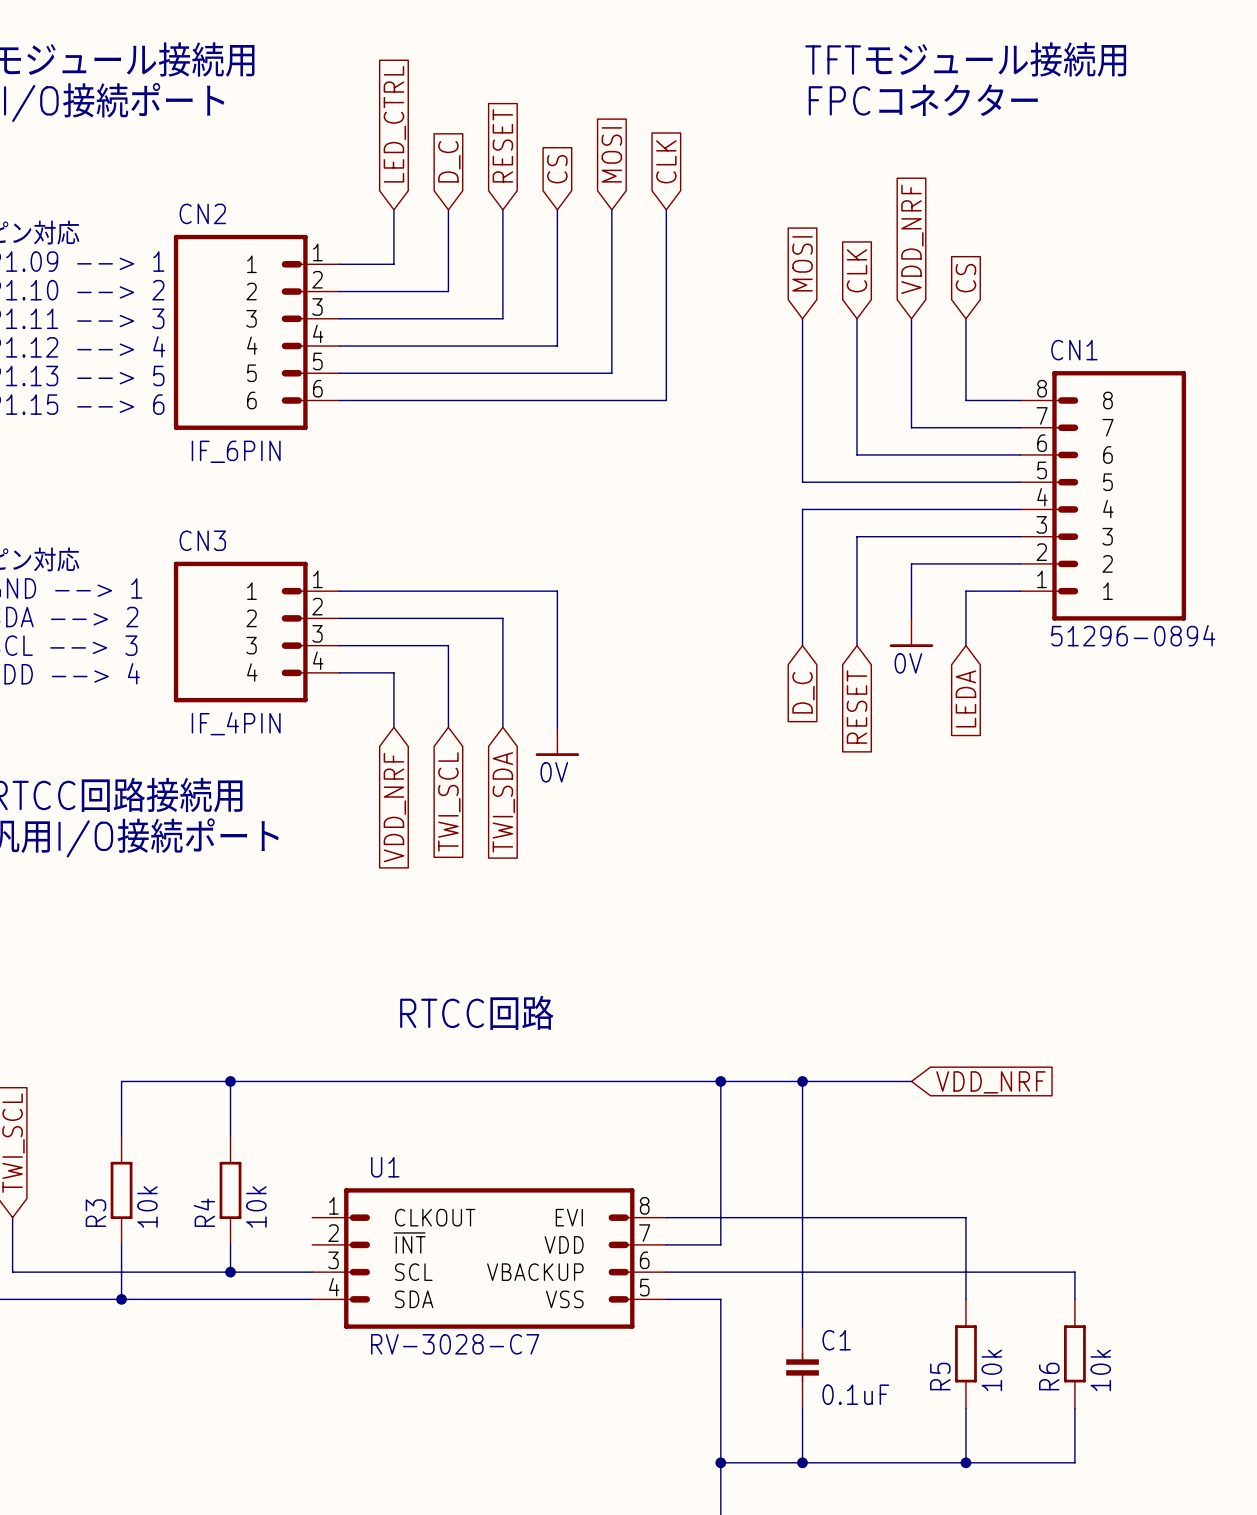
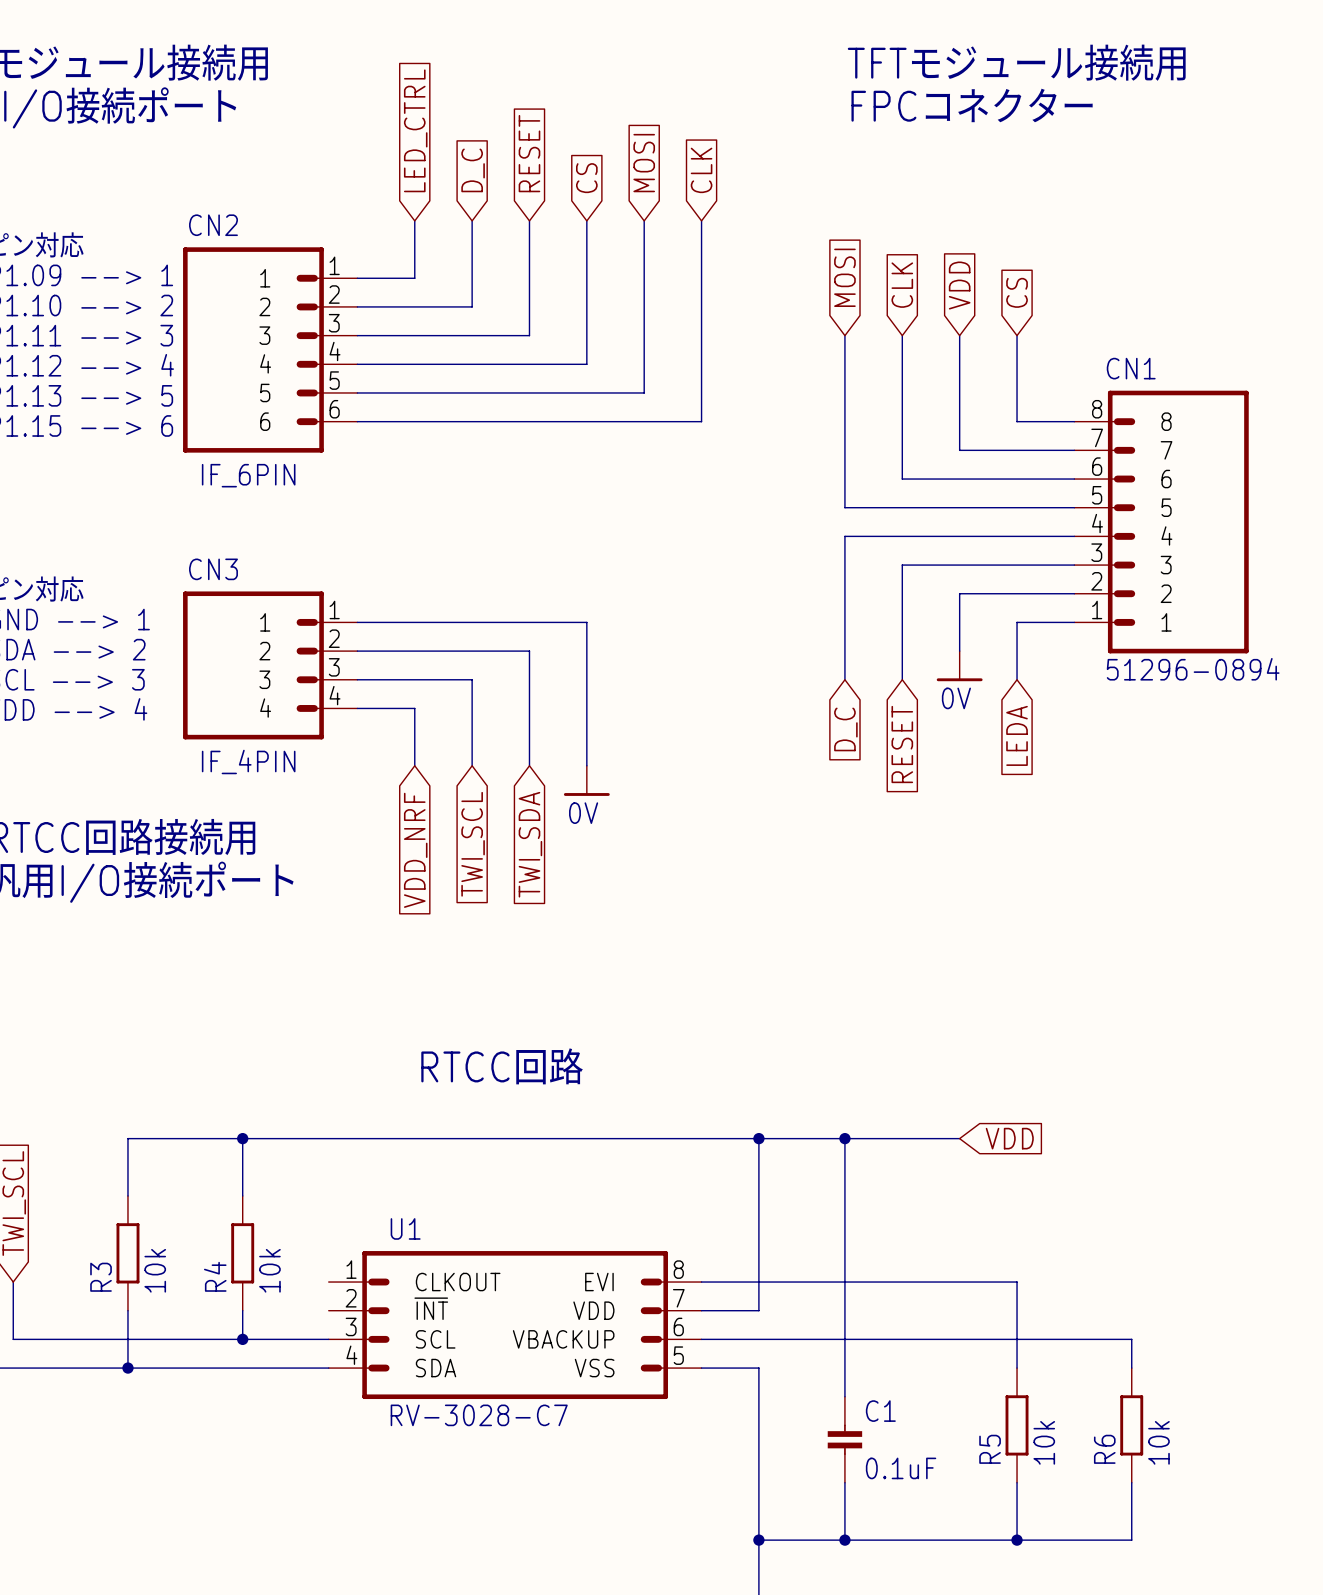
global label: VDD_NRF (912, 239) -> VDD (959, 285)
global label: VDD_NRF (990, 1082) -> VDD (1009, 1138)

